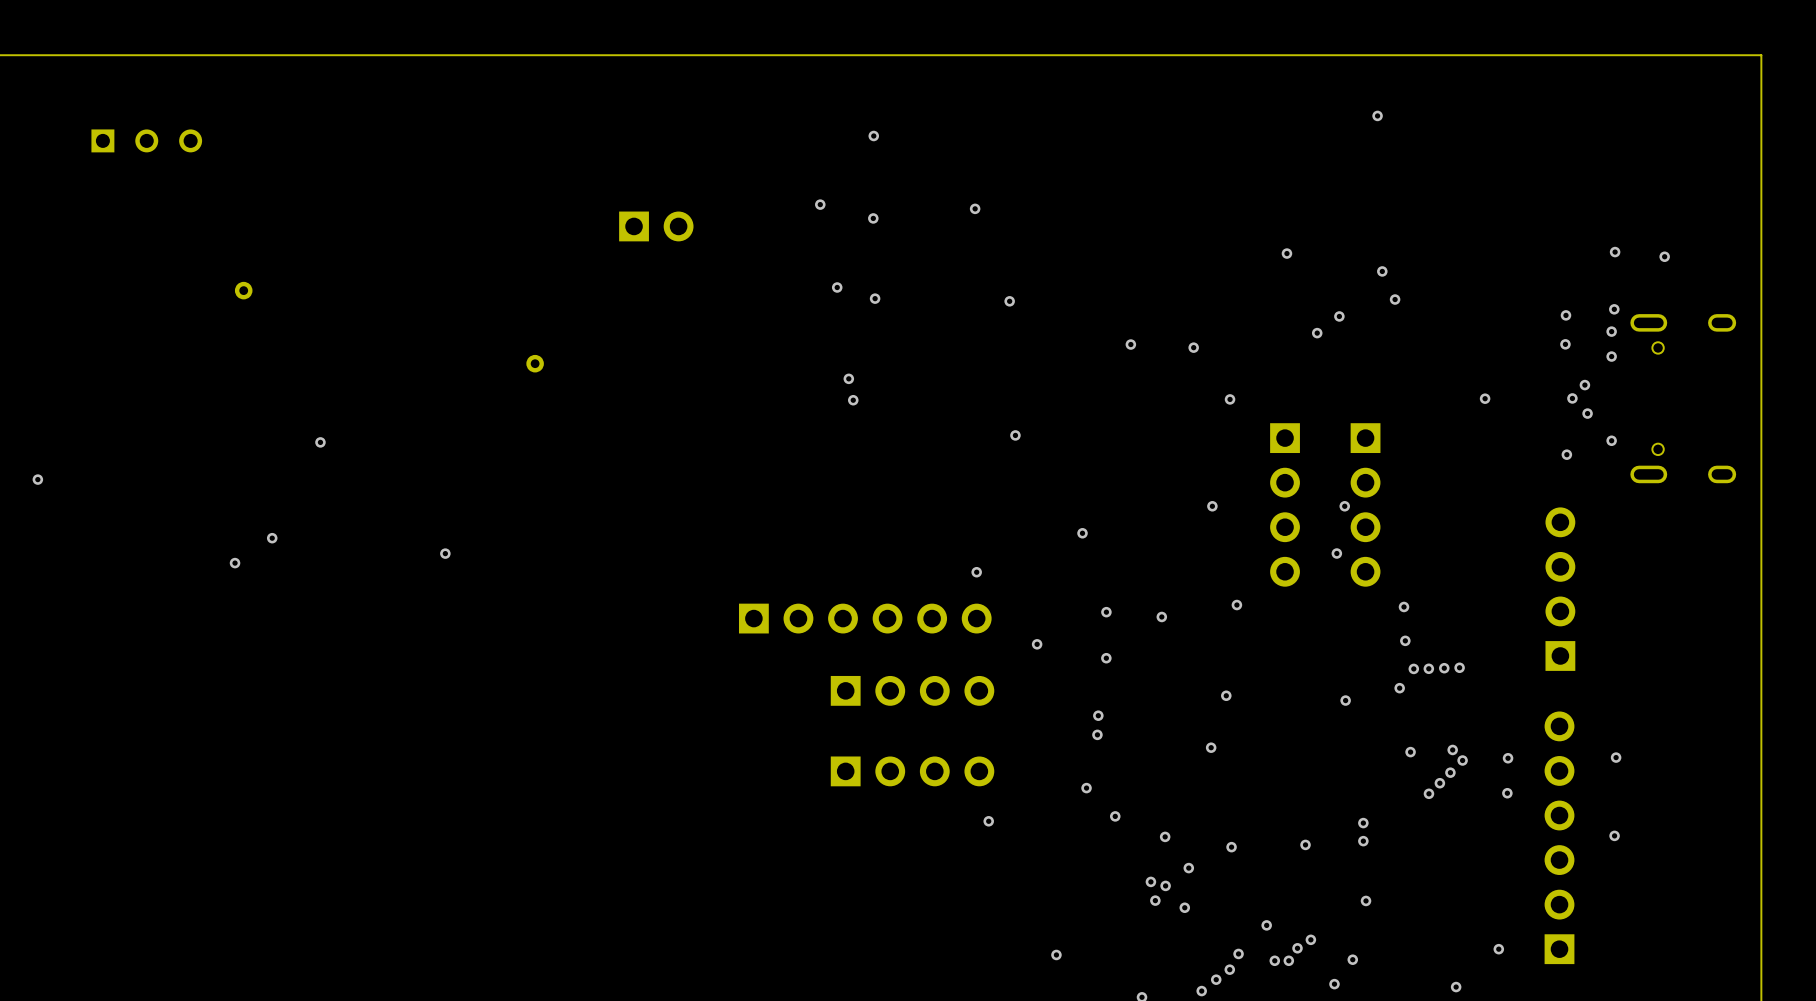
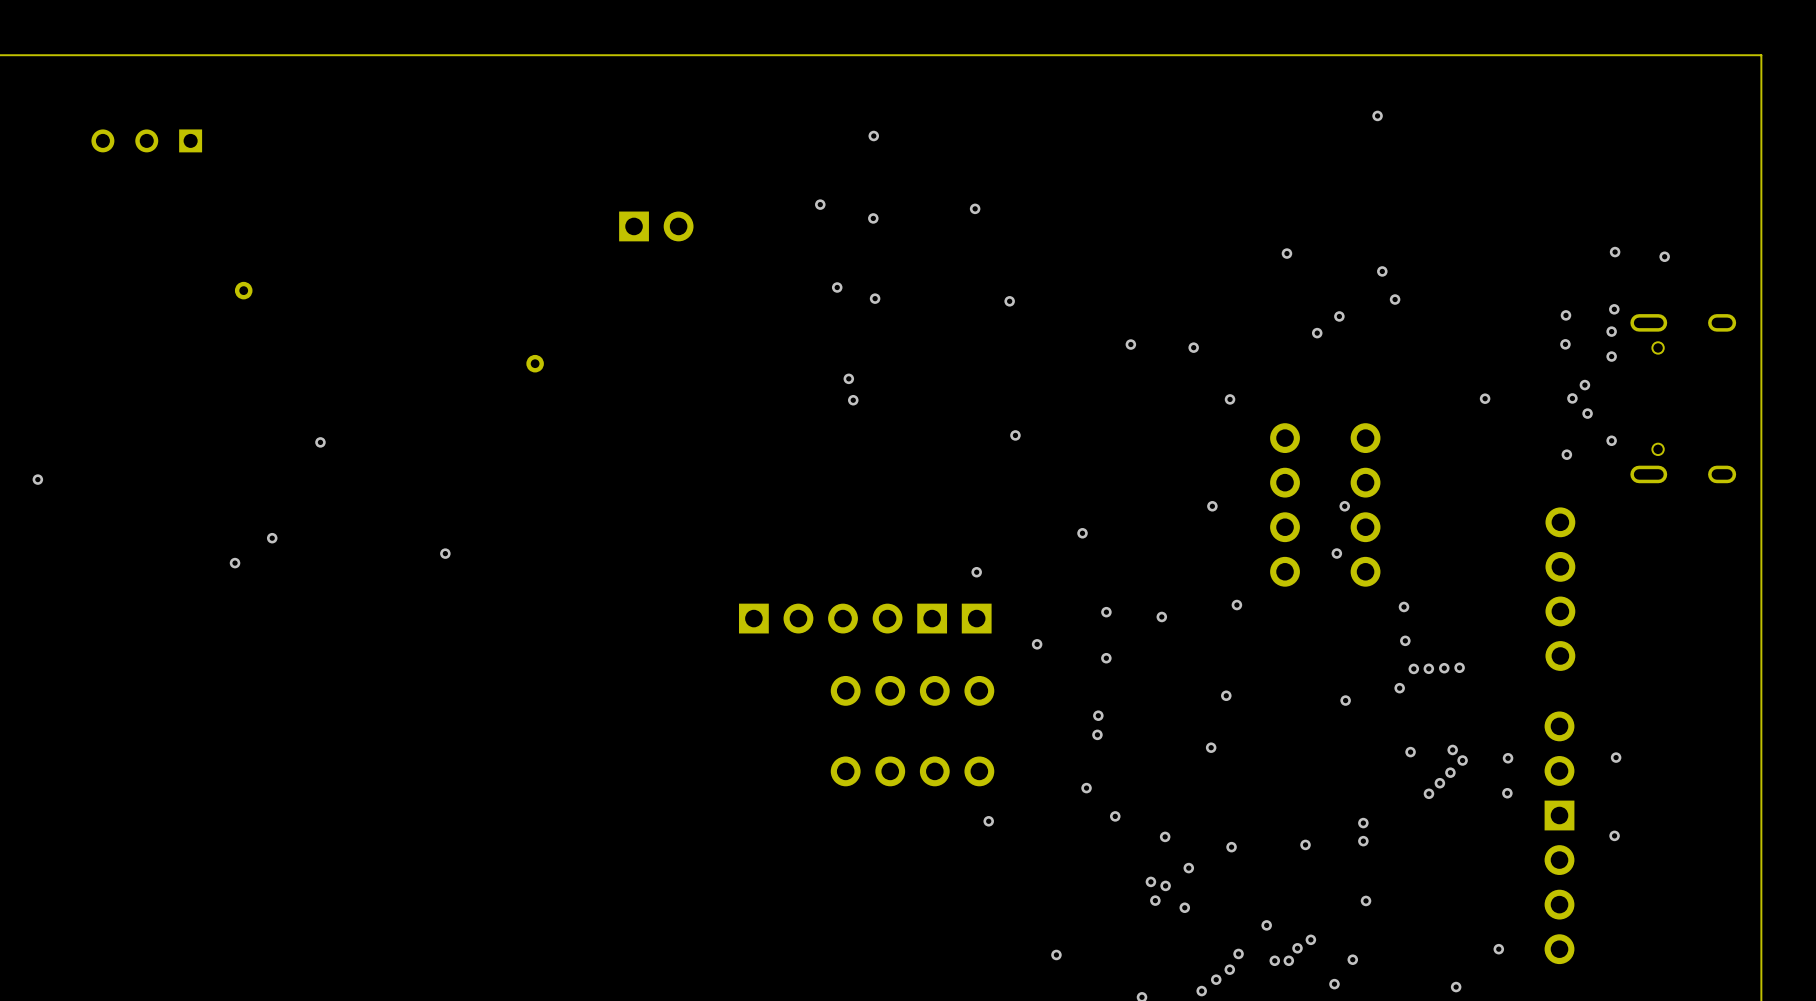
part rotation: 0° (146, 140) -> 180° (146, 140)
part footprint: [1270, 423, 1300, 587] -> [1270, 423, 1300, 587]
part footprint: [1350, 423, 1381, 587] -> [1350, 423, 1381, 587]
part footprint: [1545, 507, 1576, 671] -> [1545, 507, 1576, 671]
part footprint: [738, 603, 992, 634] -> [738, 603, 992, 634]
part footprint: [830, 675, 995, 706] -> [830, 675, 995, 706]
part footprint: [1544, 711, 1575, 965] -> [1544, 711, 1575, 965]
part footprint: [830, 756, 995, 787] -> [830, 756, 995, 787]

